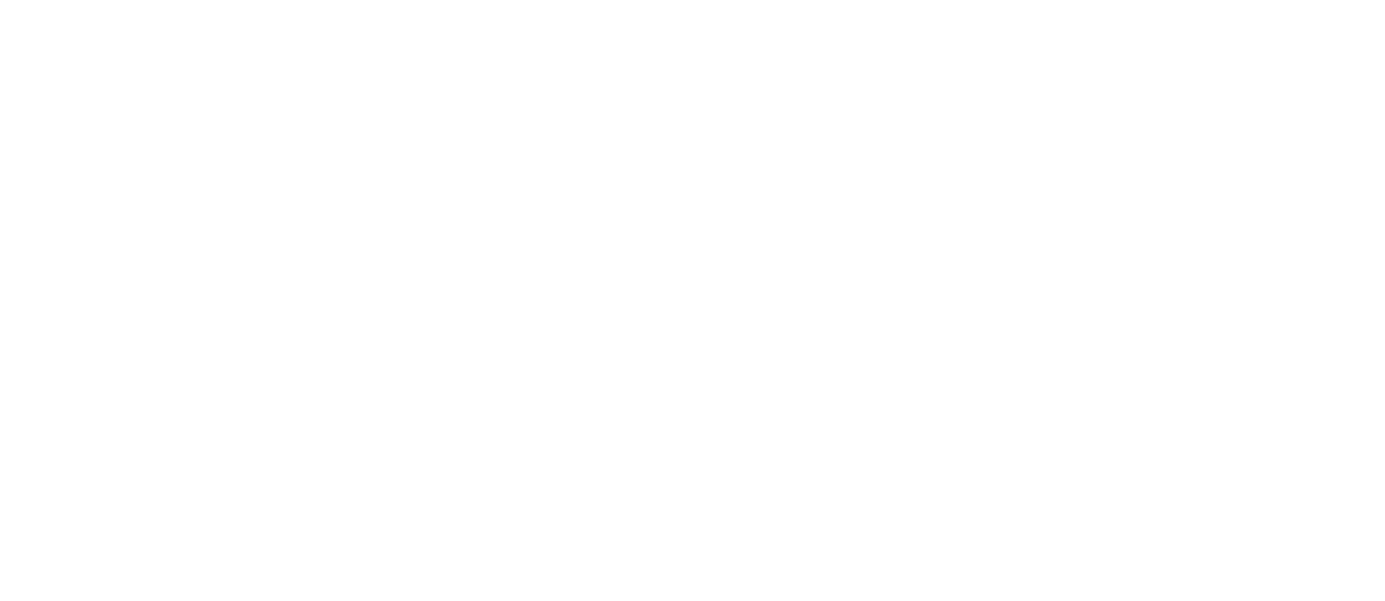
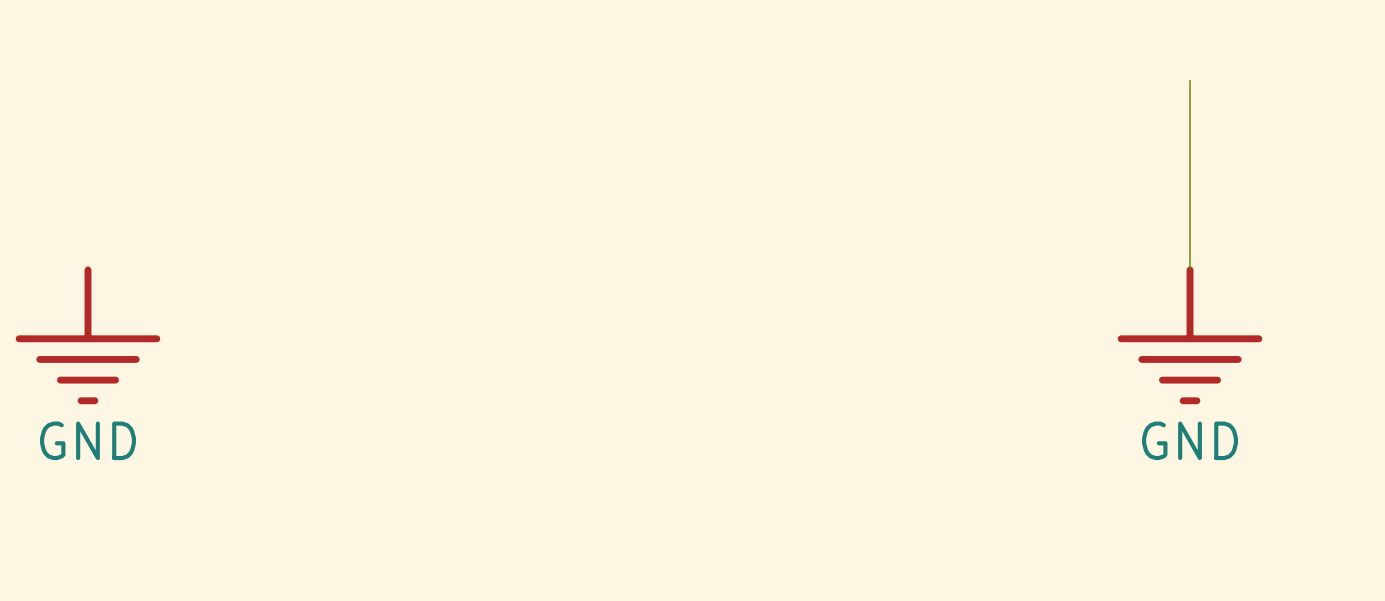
wire: none -> (1190, 80) (1190, 269)
power symbol: none -> GND (87, 335)
power symbol: none -> GND (1190, 335)

